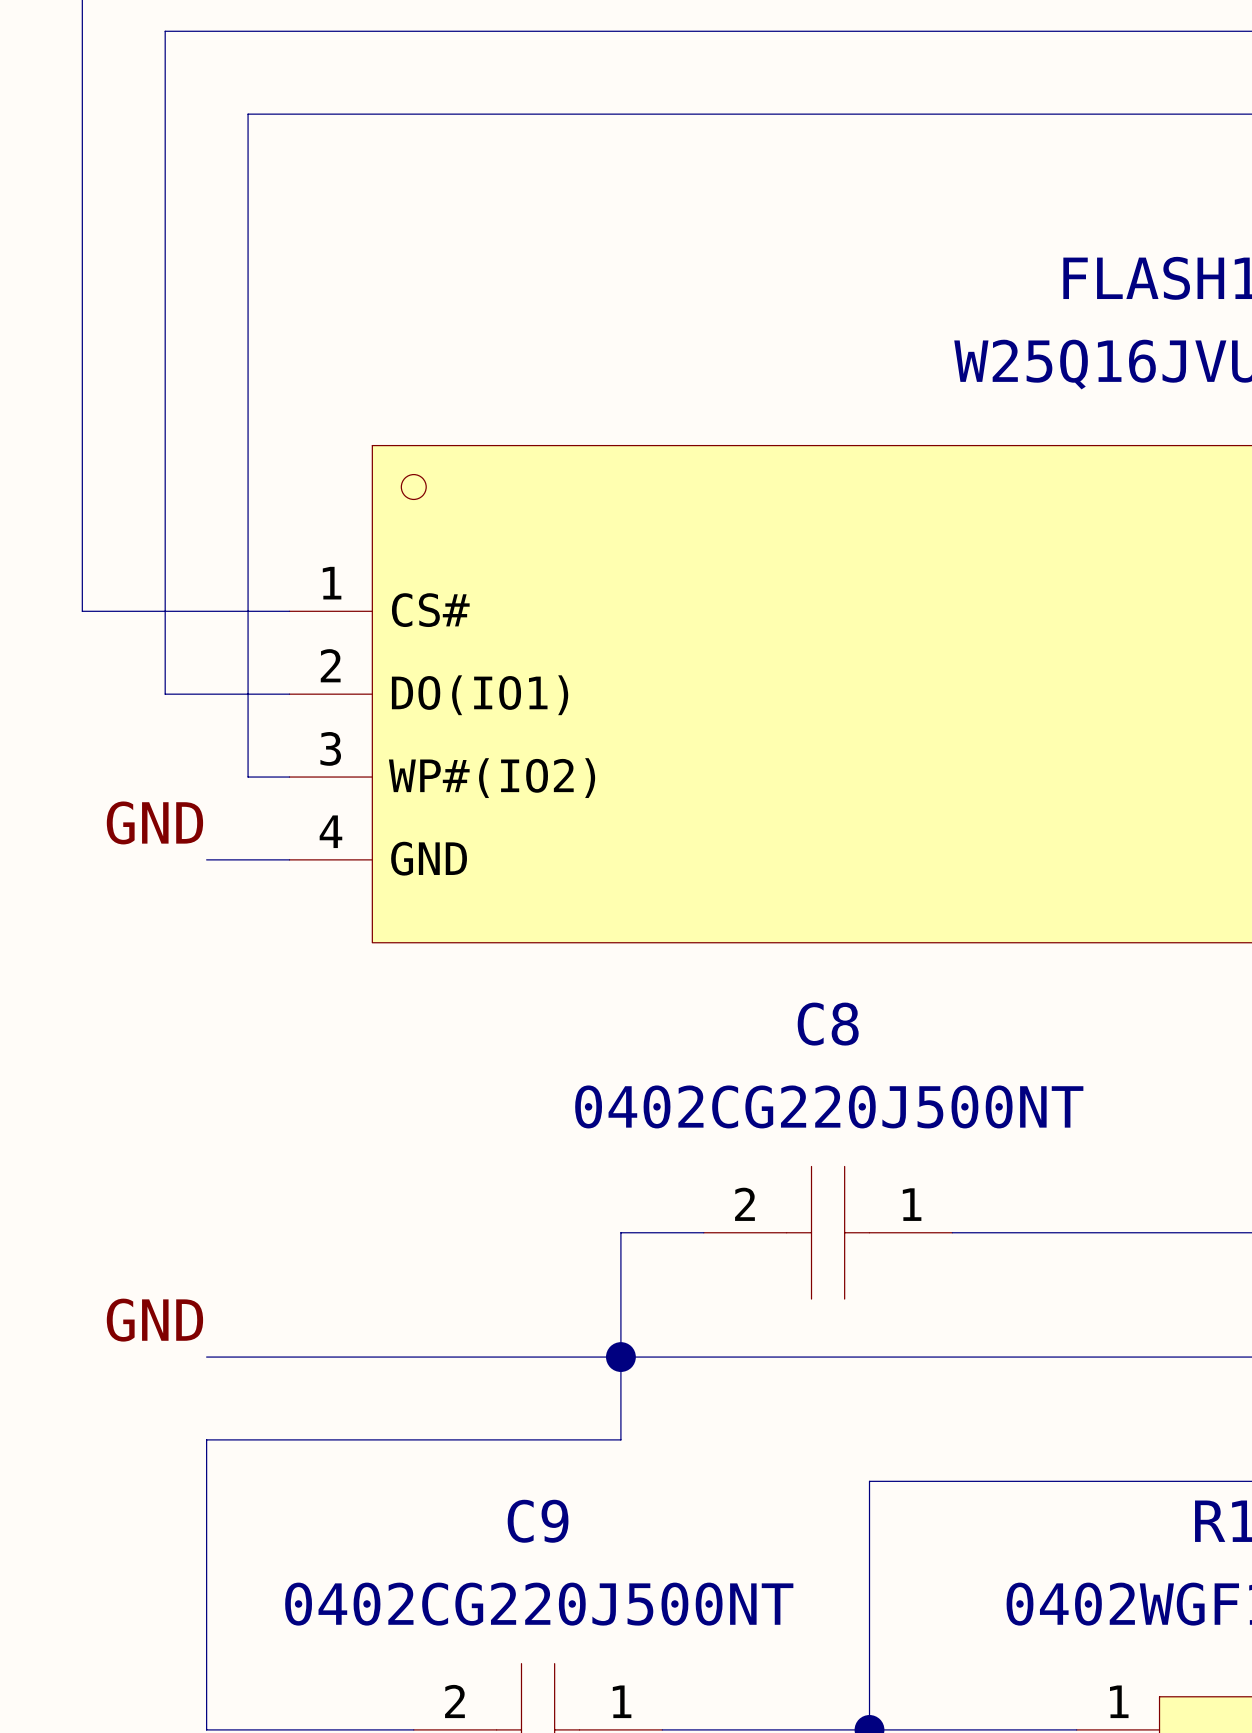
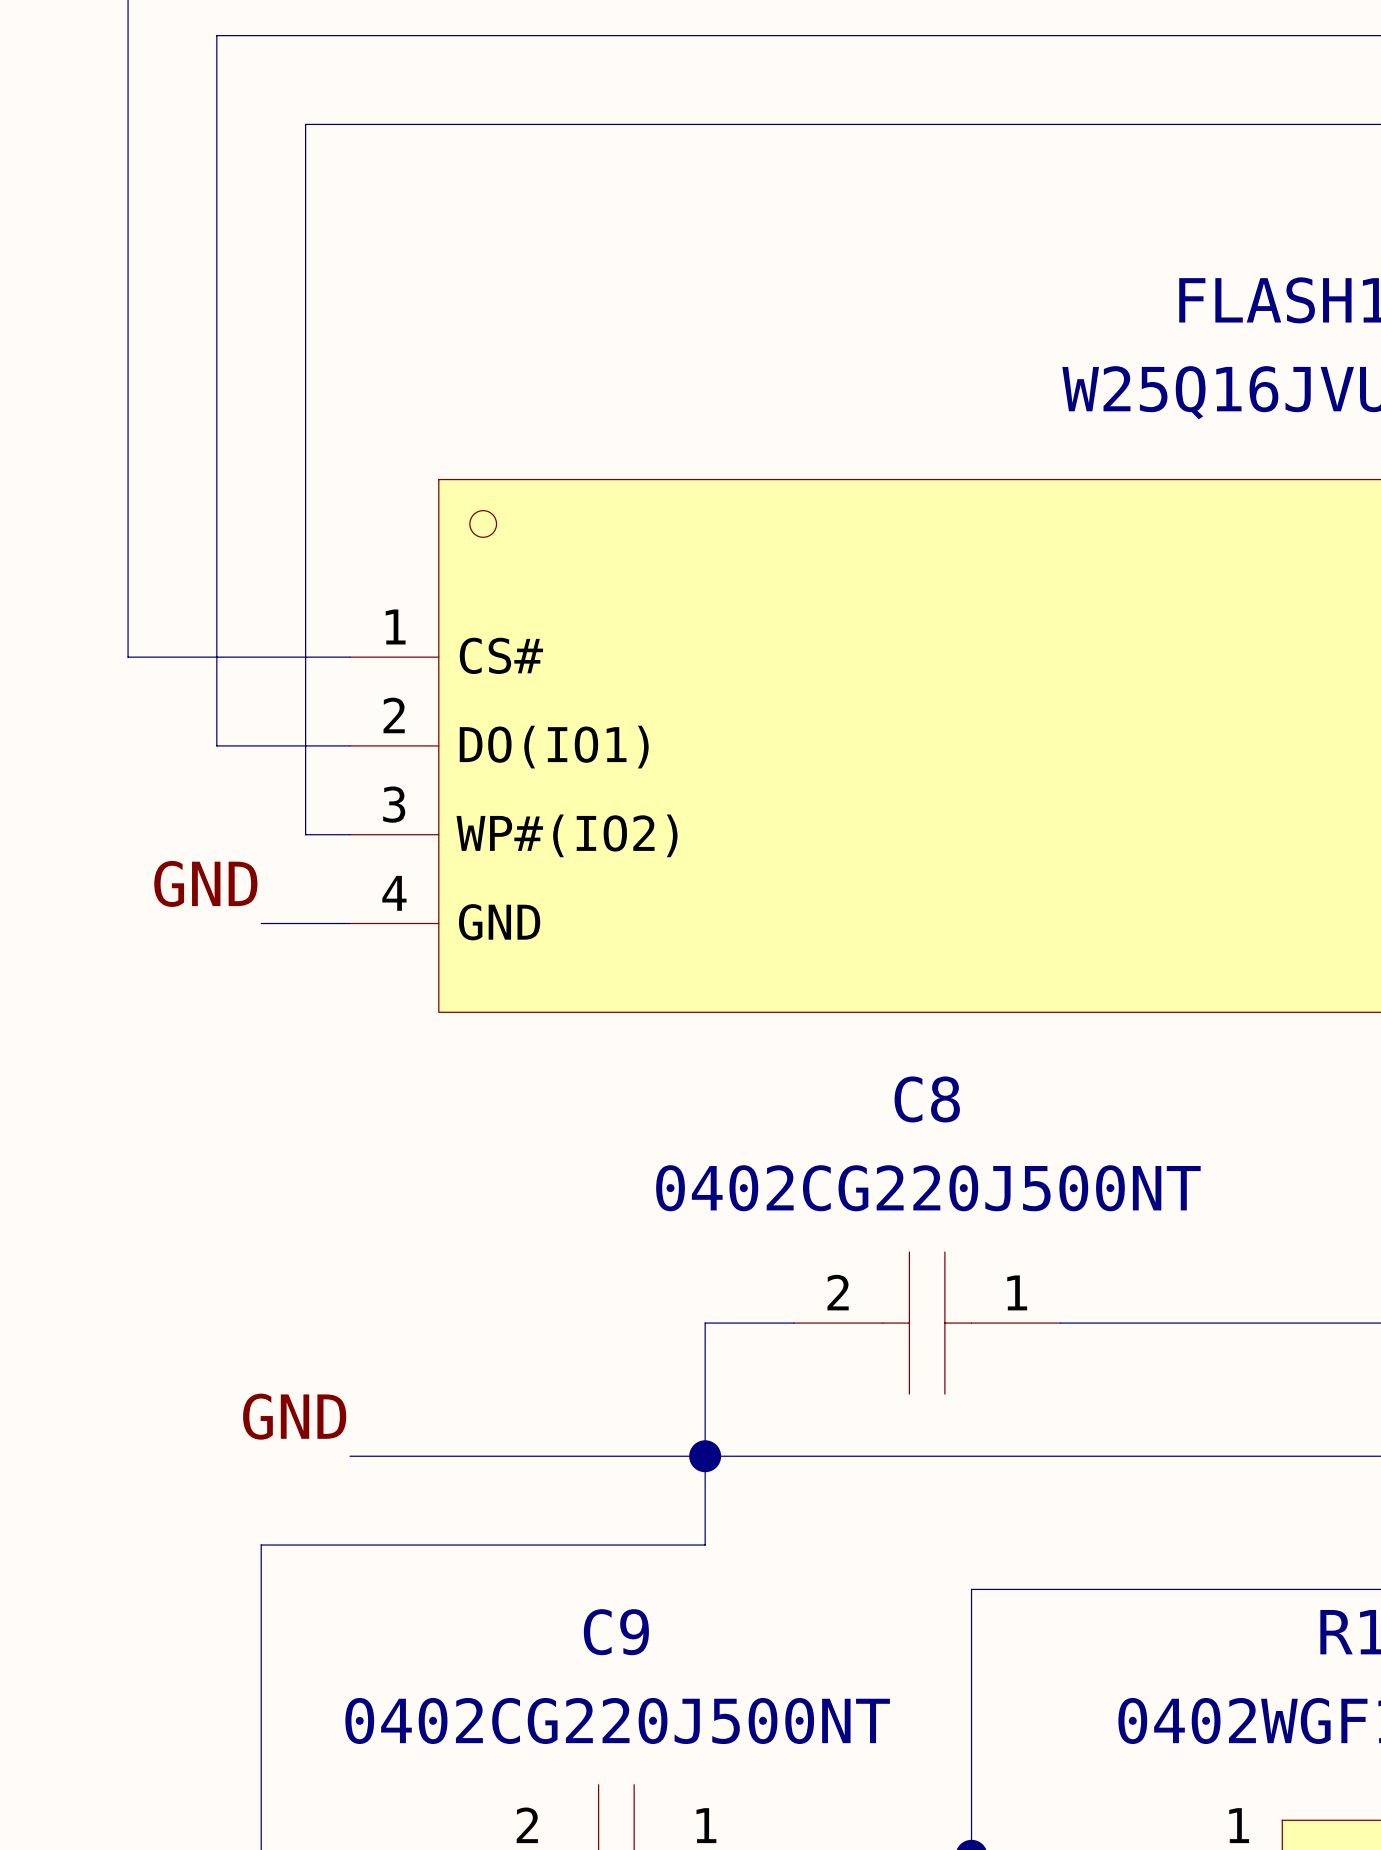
label position: GND (154, 1320) -> GND (294, 1416)
wire: (206, 1357) (289, 1357) -> none

